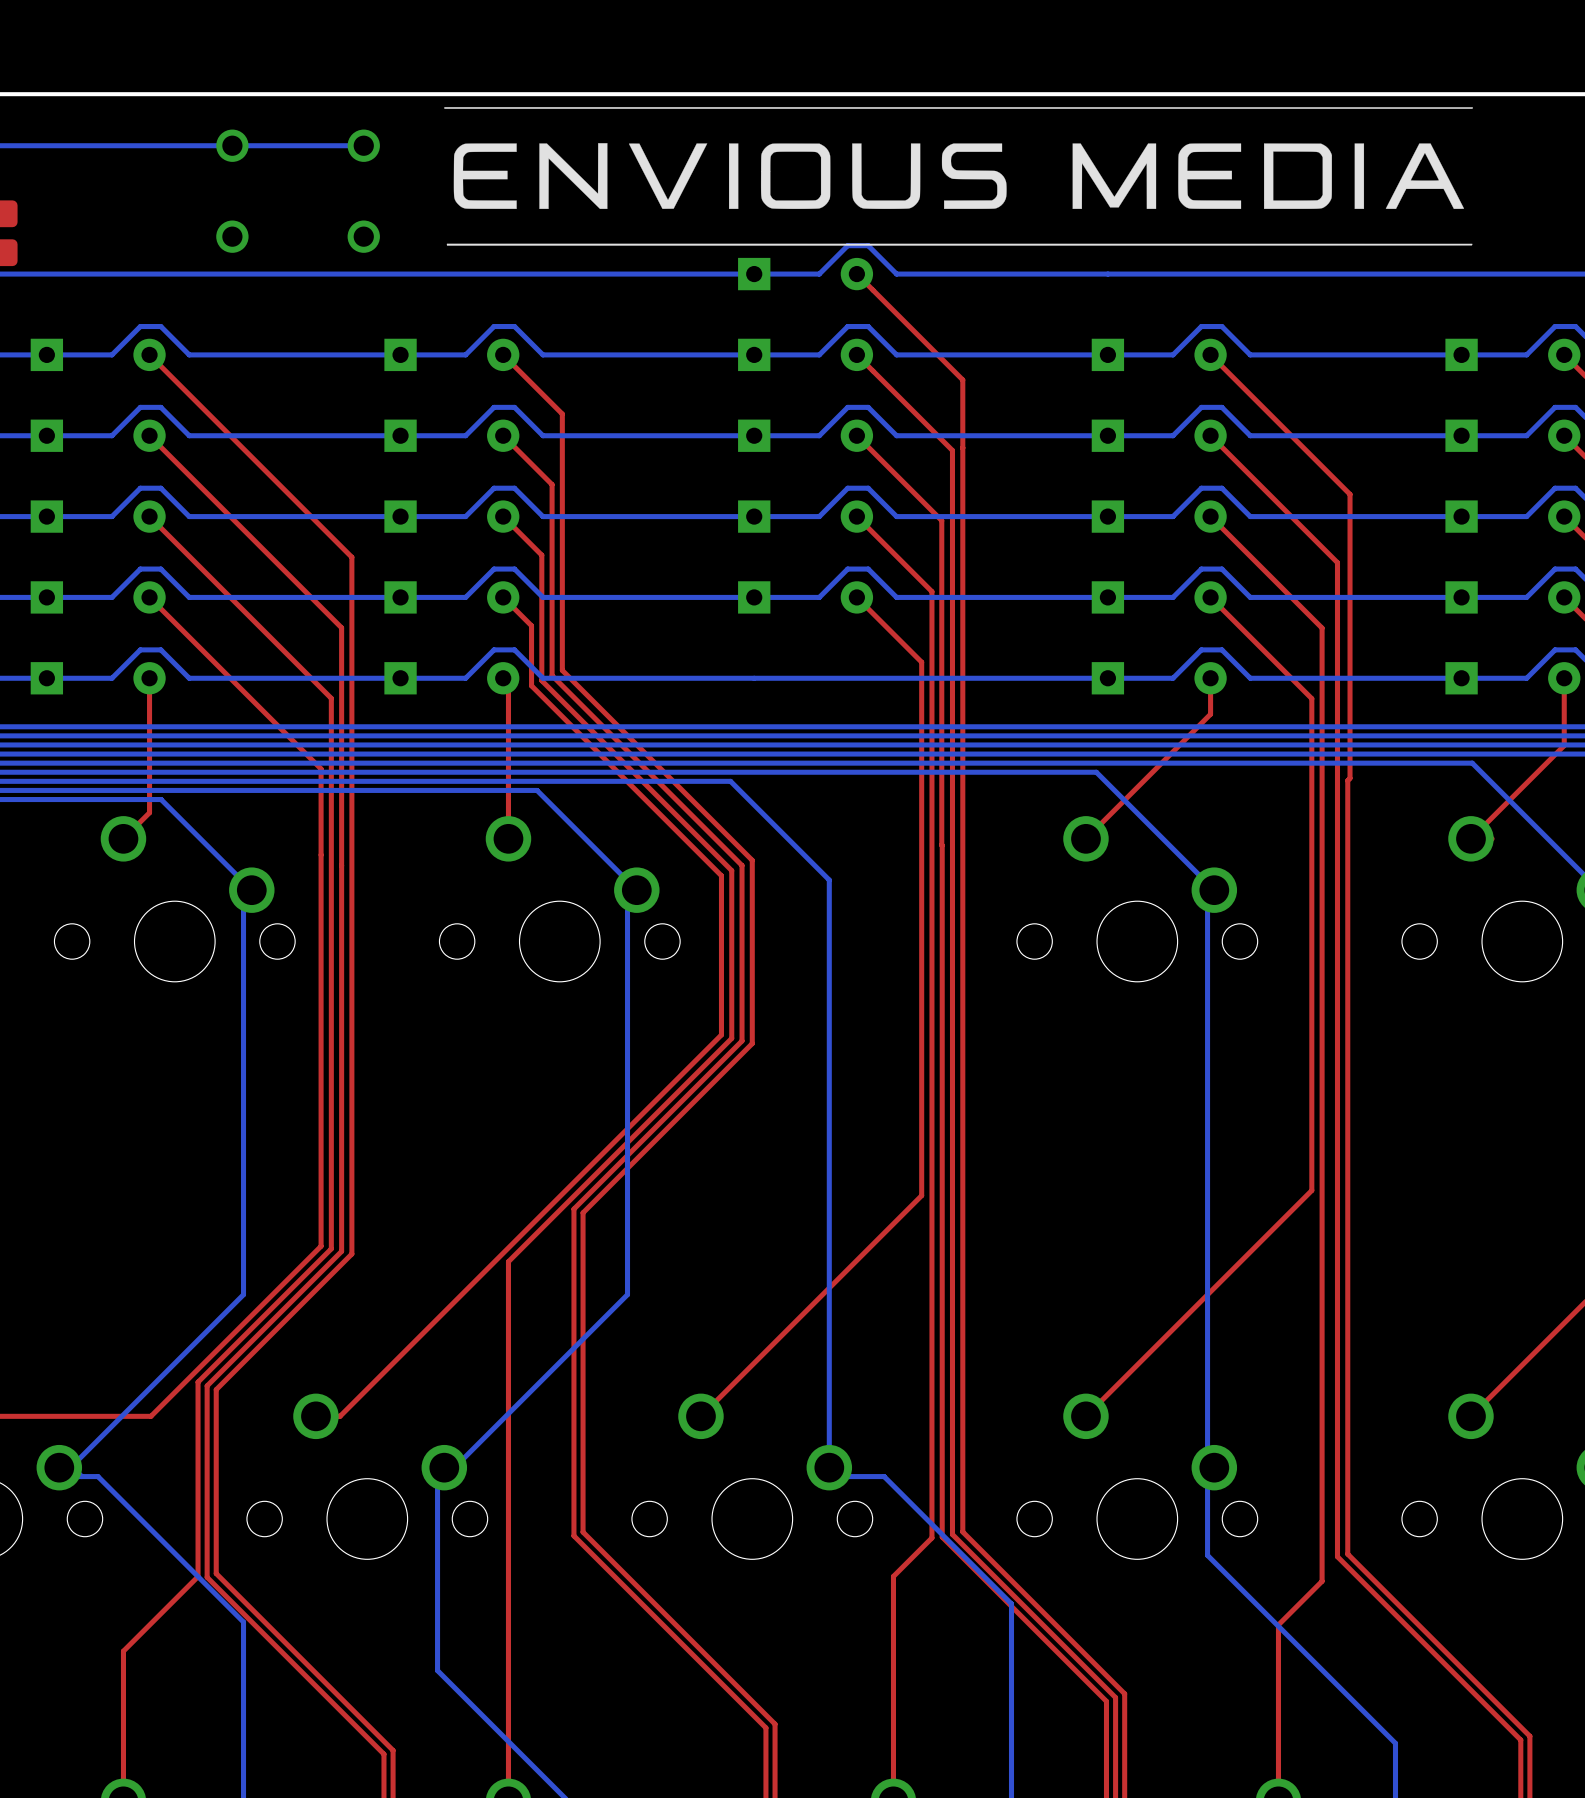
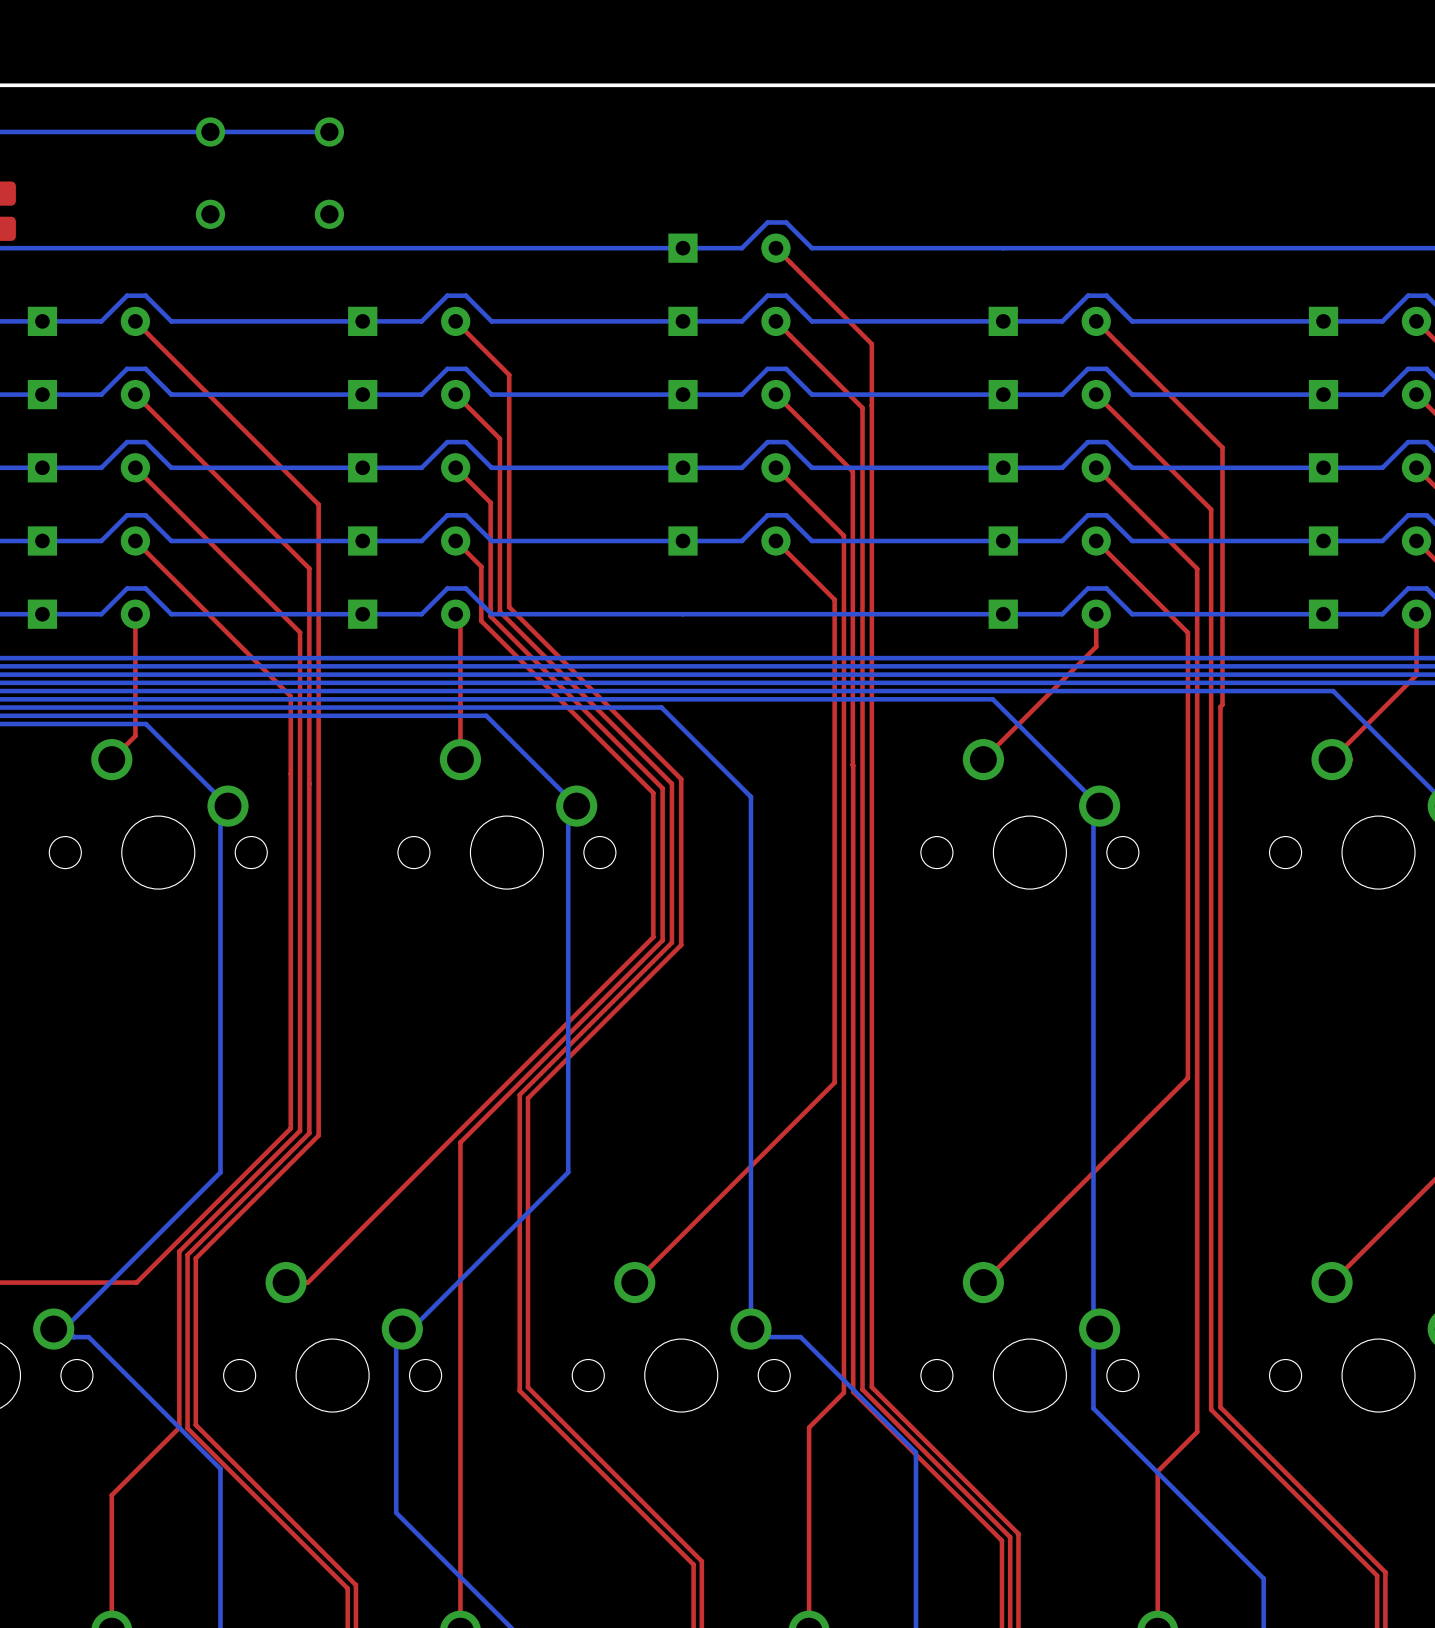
drawing: [444, 107, 1473, 246] -> none

